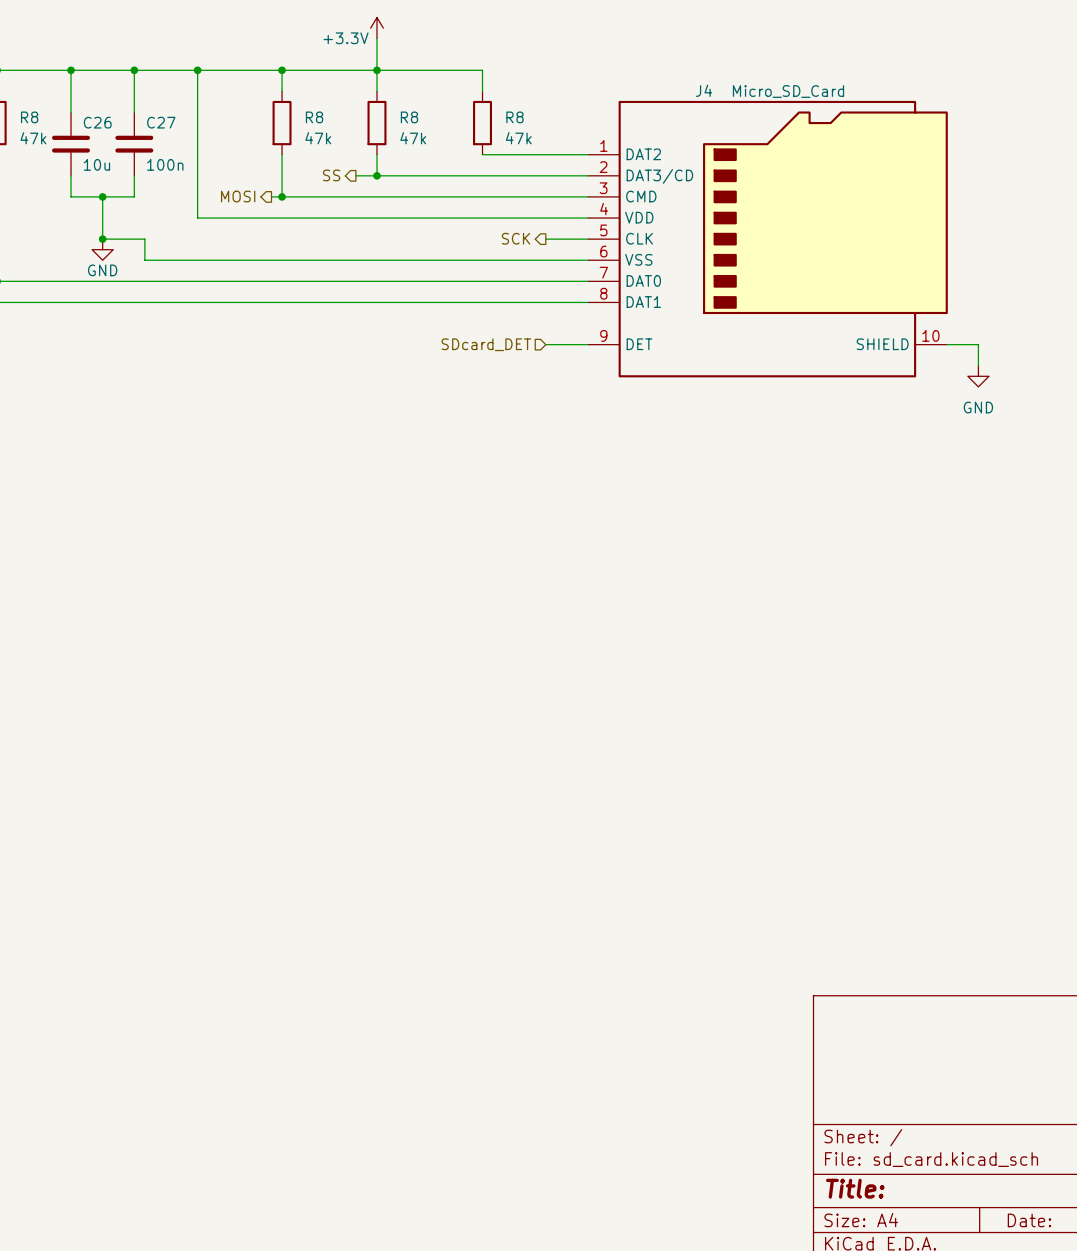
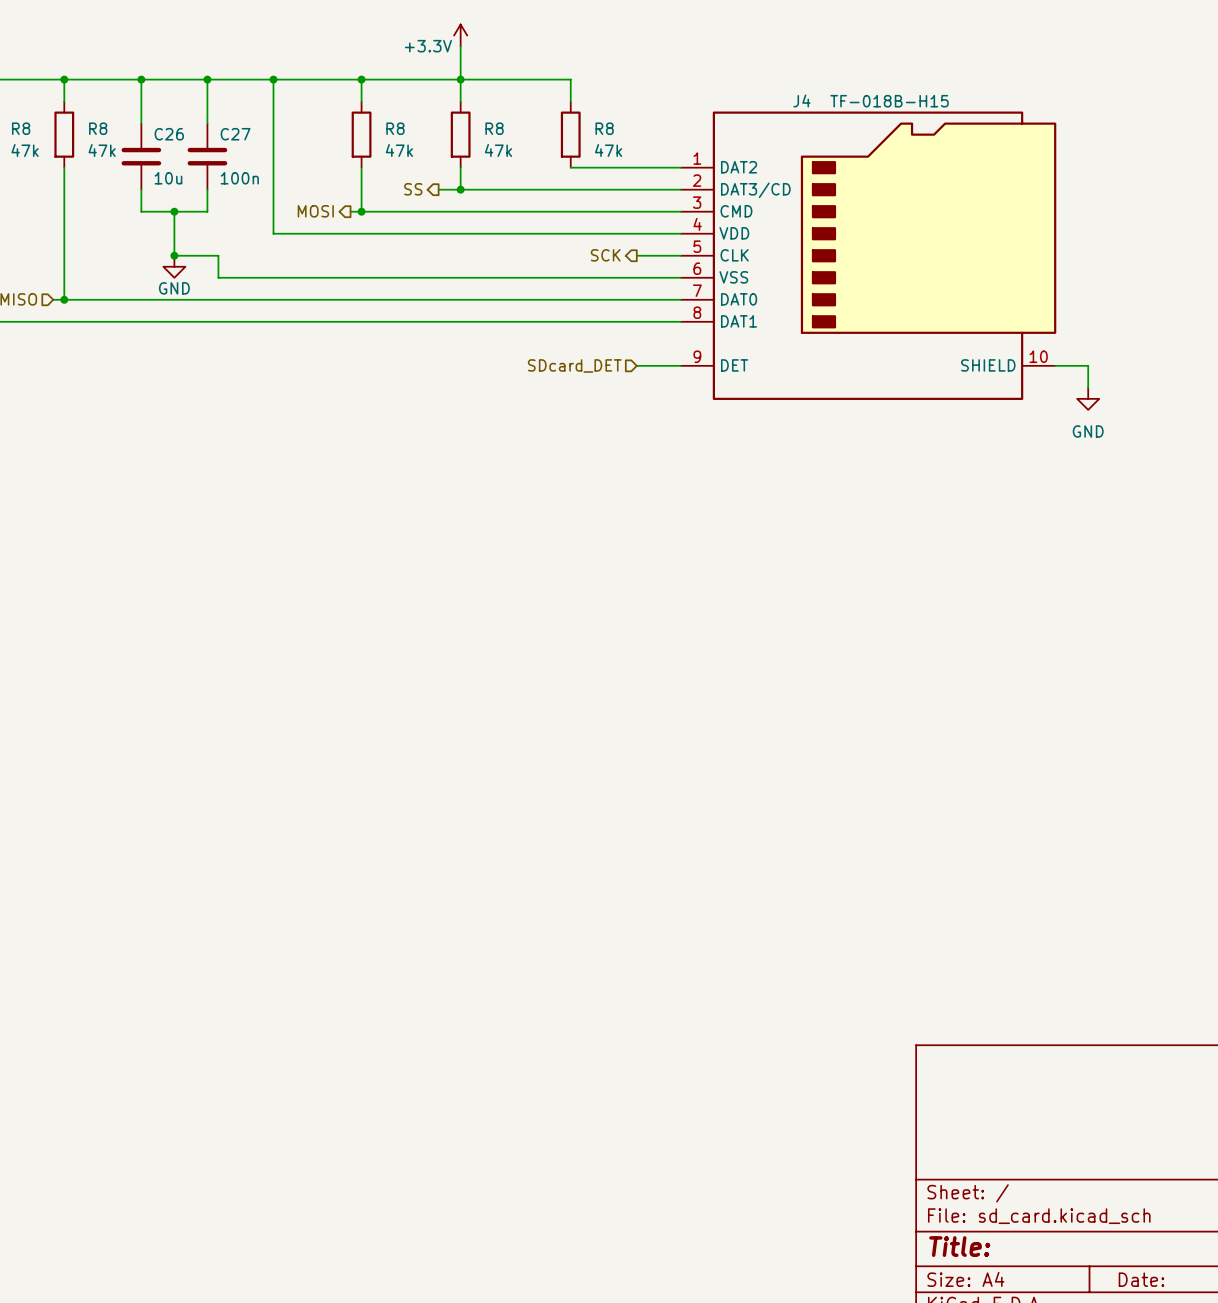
J4 value: Micro_SD_Card (788, 91) -> TF-018B-H15 (889, 101)

